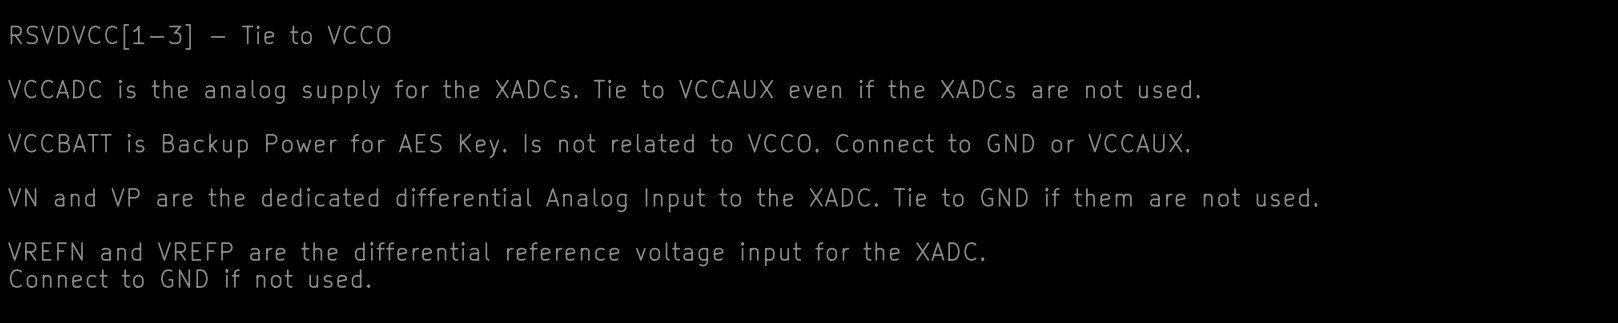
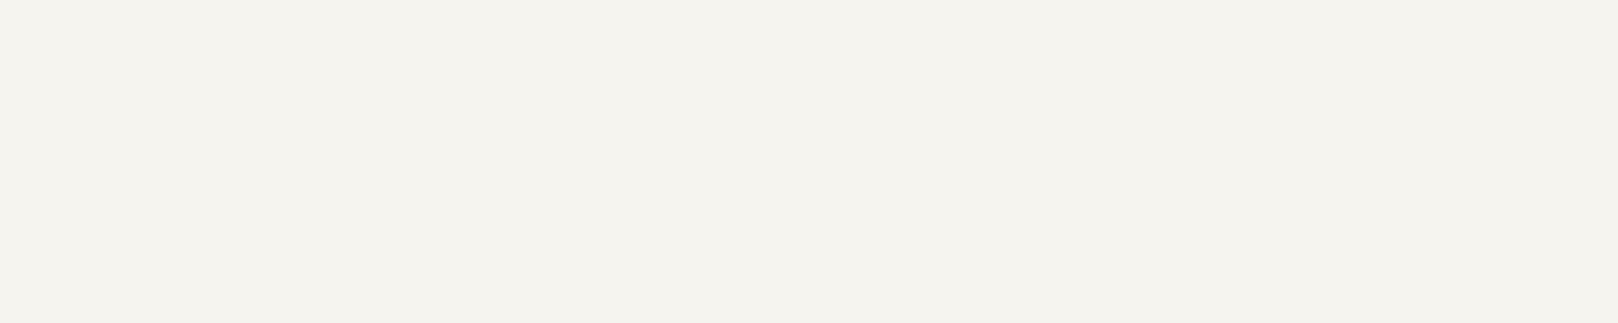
text: RSVDVCC[1-3] - Tie to VCCO (200, 36) -> none
text: VCCADC is the analog supply for the XADCs. Tie to VCCAUX even if the XADCs are not used. (604, 91) -> none
text: VCCBATT is Backup Power for AES Key. Is not related to VCCO. Connect to GND or VCCAUX. (598, 146) -> none
text: VN and VP are the dedicated differential Analog Input to the XADC. Tie to GND if them are not used. (662, 200) -> none
text: VREFN and VREFP are the differential reference voltage input for the XADC. (496, 254) -> none
text: Connect to GND if not used. (190, 278) -> none

